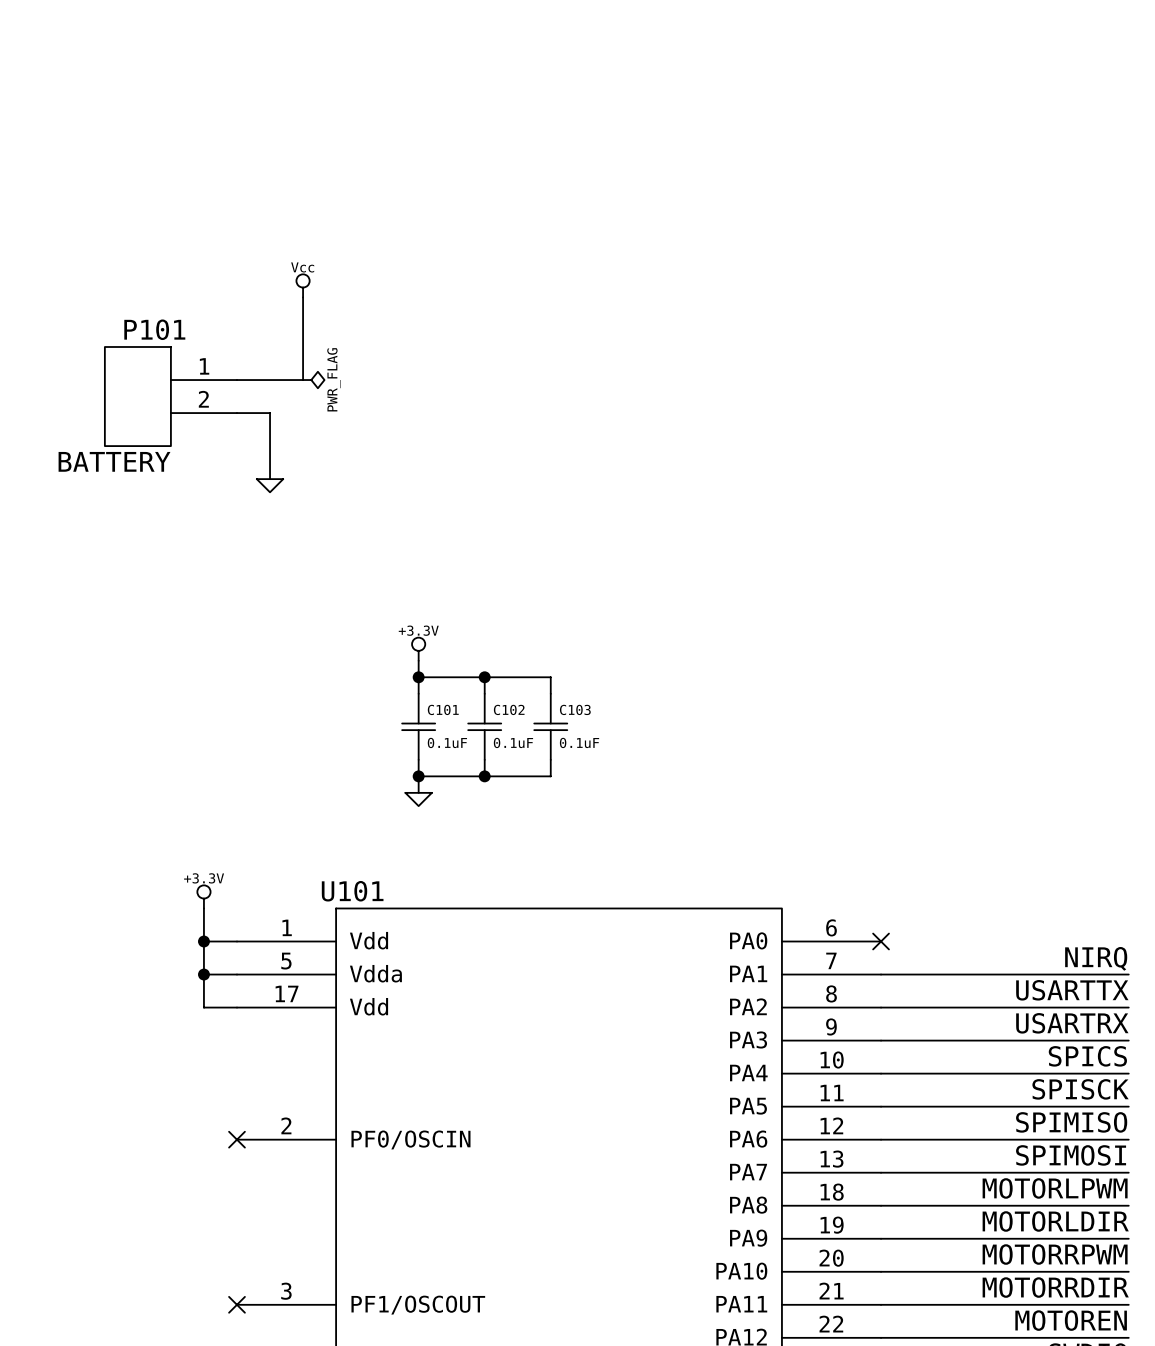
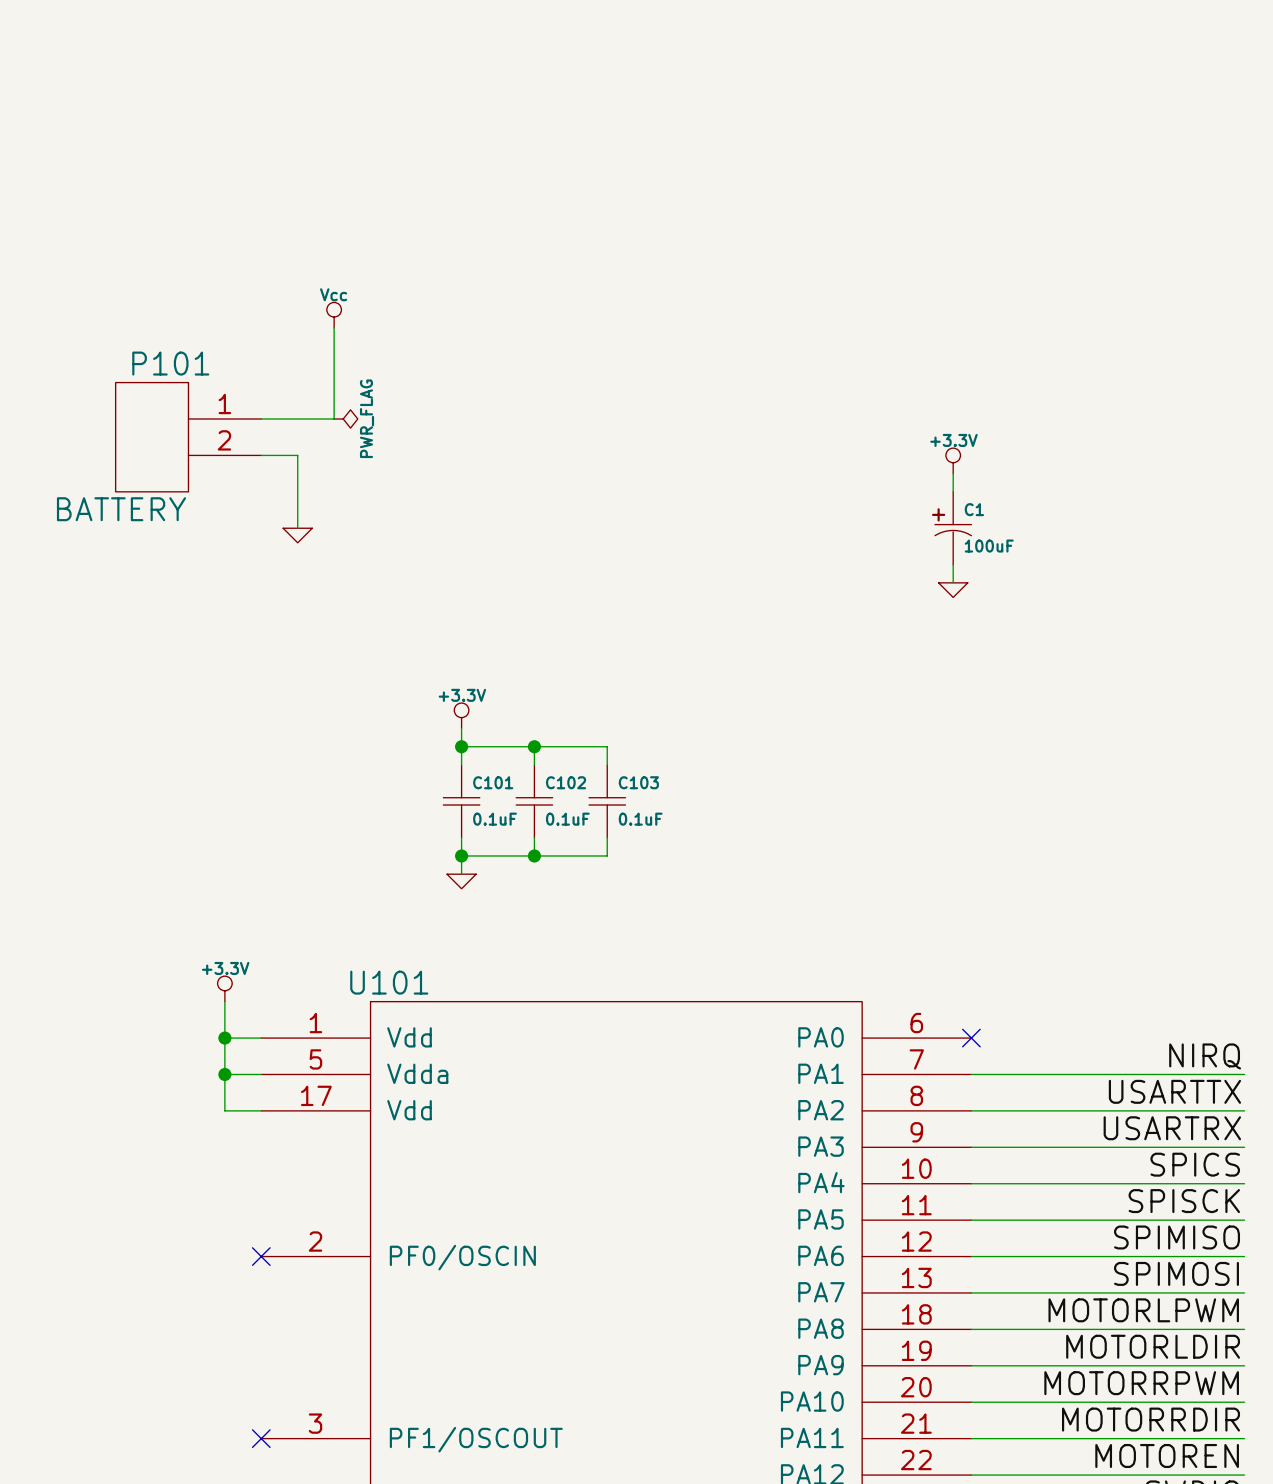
power symbol: none -> +3.3V (953, 460)
wire: none -> (953, 473) (953, 491)
C1: none -> 100uF (953, 528)
wire: none -> (953, 564) (953, 582)
power symbol: none -> (953, 590)

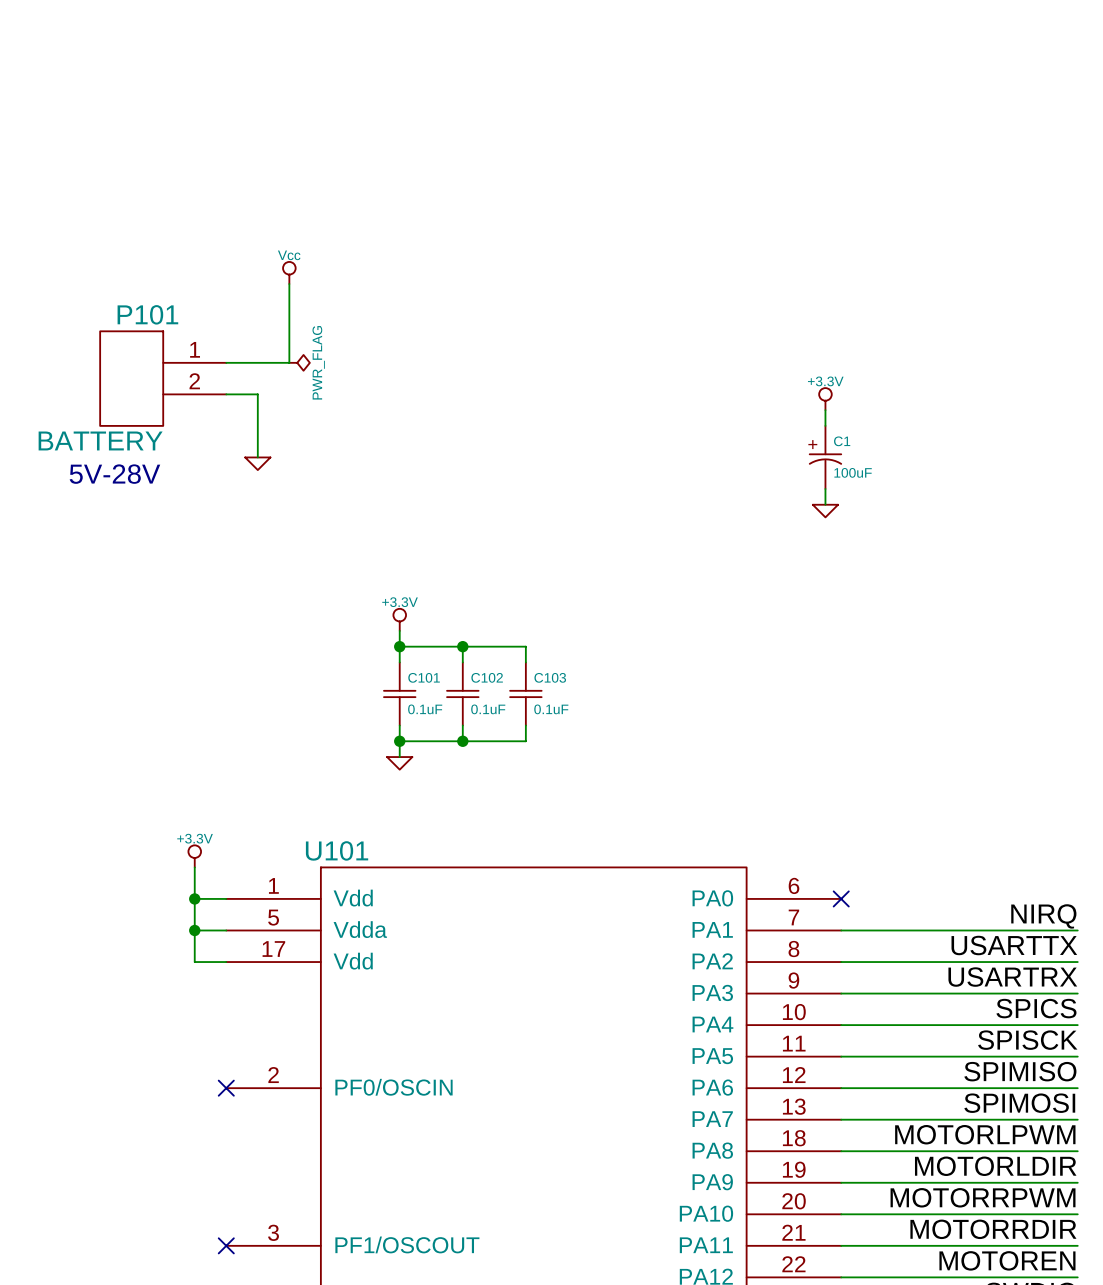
text: none -> 5V-28V (114, 474)

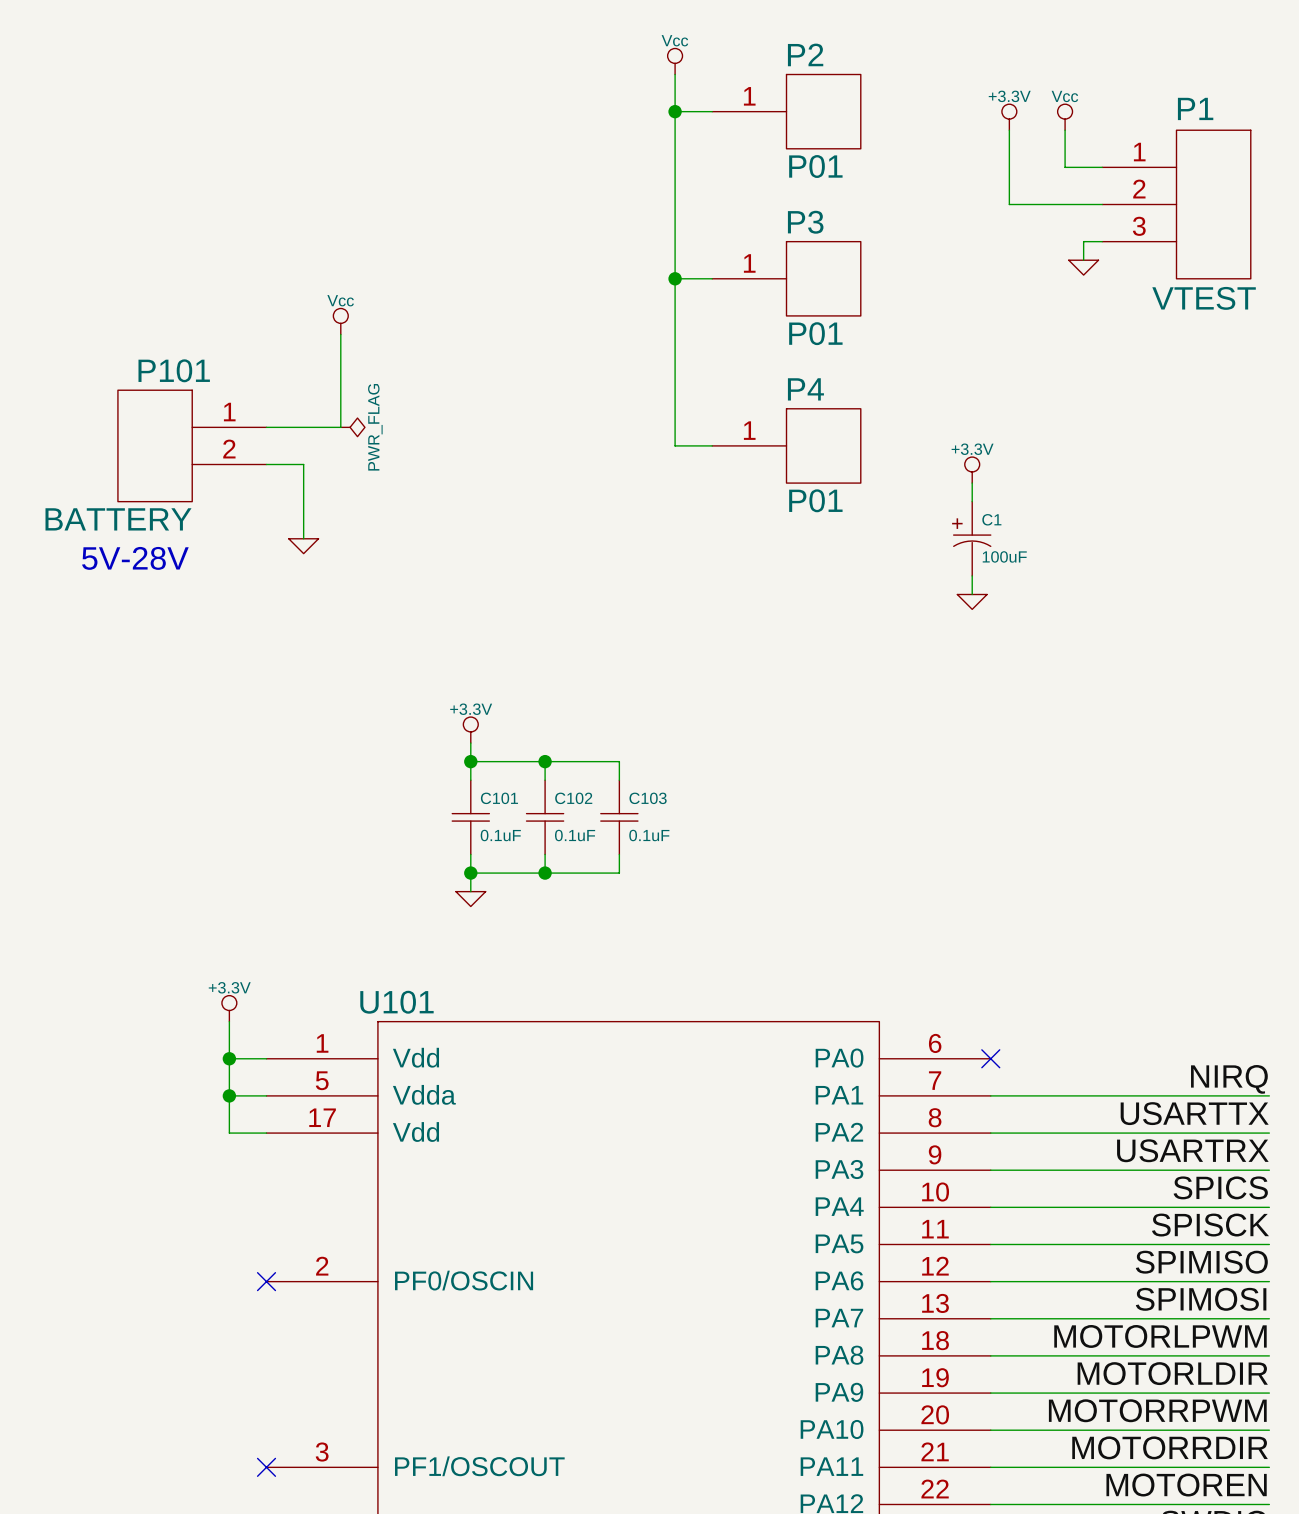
power symbol: none -> Vcc (675, 61)
wire: none -> (675, 74) (675, 445) (712, 445)
wire: none -> (675, 111) (712, 111)
junction: none -> (675, 111)
P2: none -> P01 (786, 111)
power symbol: none -> +3.3V (1009, 117)
power symbol: none -> Vcc (1065, 117)
wire: none -> (1009, 130) (1009, 204) (1102, 204)
wire: none -> (1065, 130) (1065, 167) (1102, 167)
P1: none -> VTEST (1176, 204)
wire: none -> (1102, 241) (1083, 241) (1083, 260)
power symbol: none -> (1083, 267)
wire: none -> (675, 278) (712, 278)
junction: none -> (675, 278)
P3: none -> P01 (786, 278)
P4: none -> P01 (786, 445)

